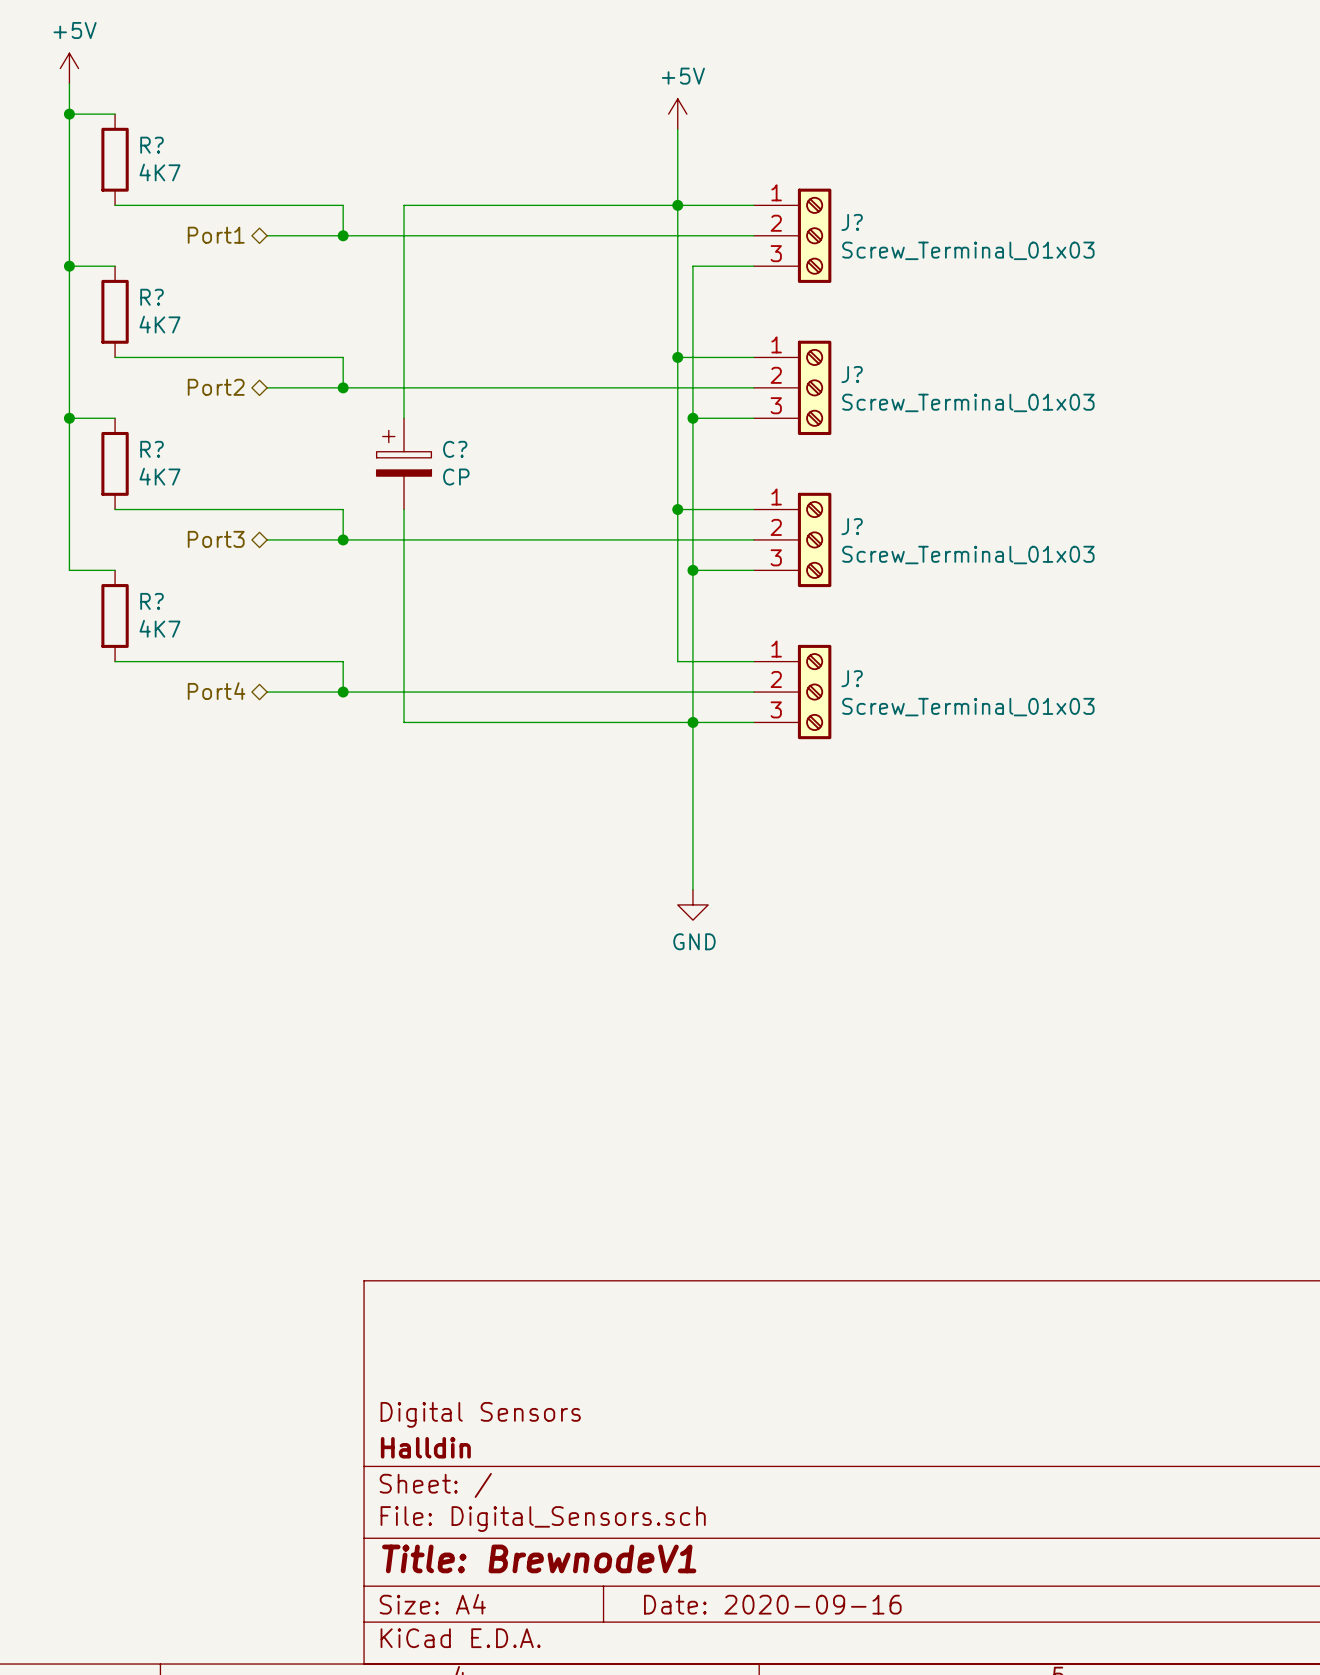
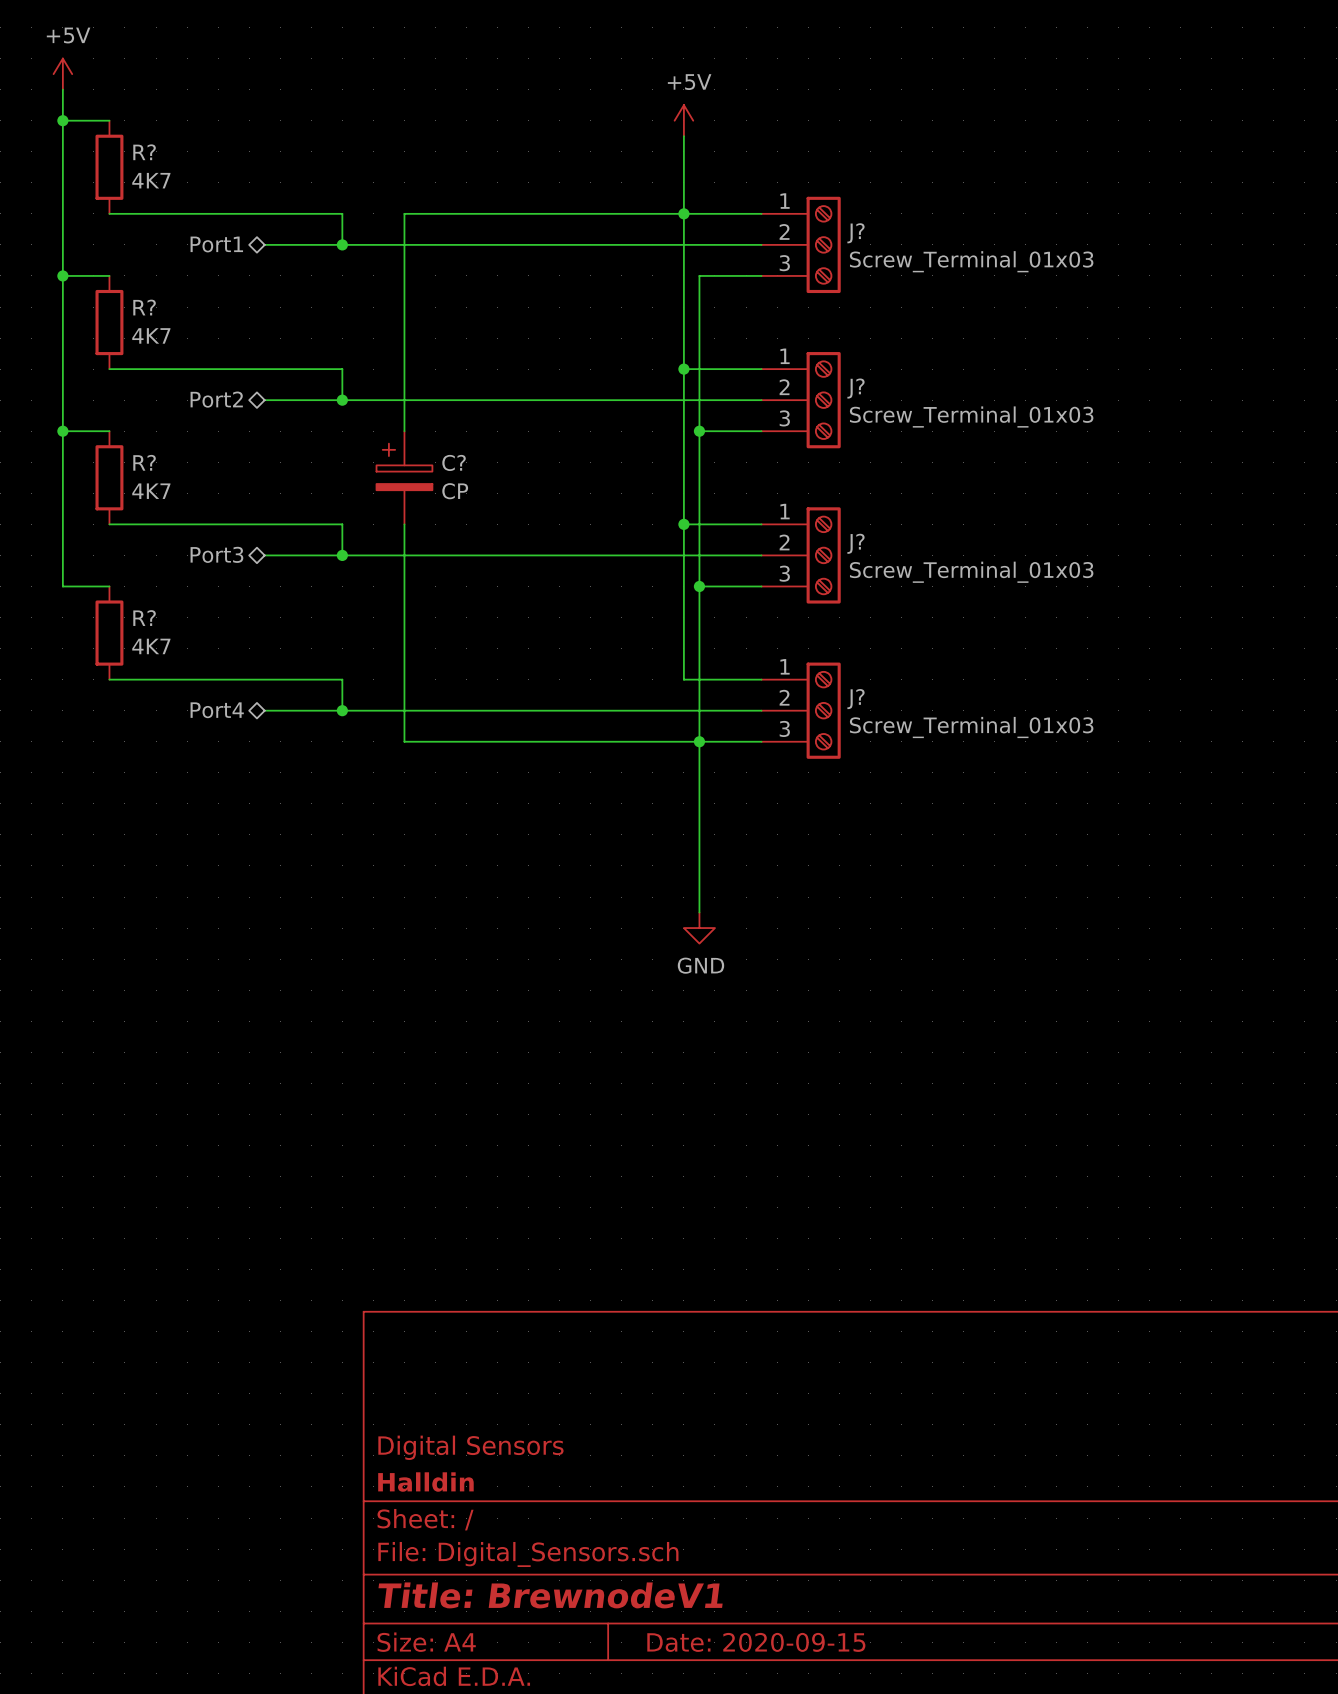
title block: Date: 2020-09-16 (772, 1604) -> Date: 2020-09-15 (756, 1642)

